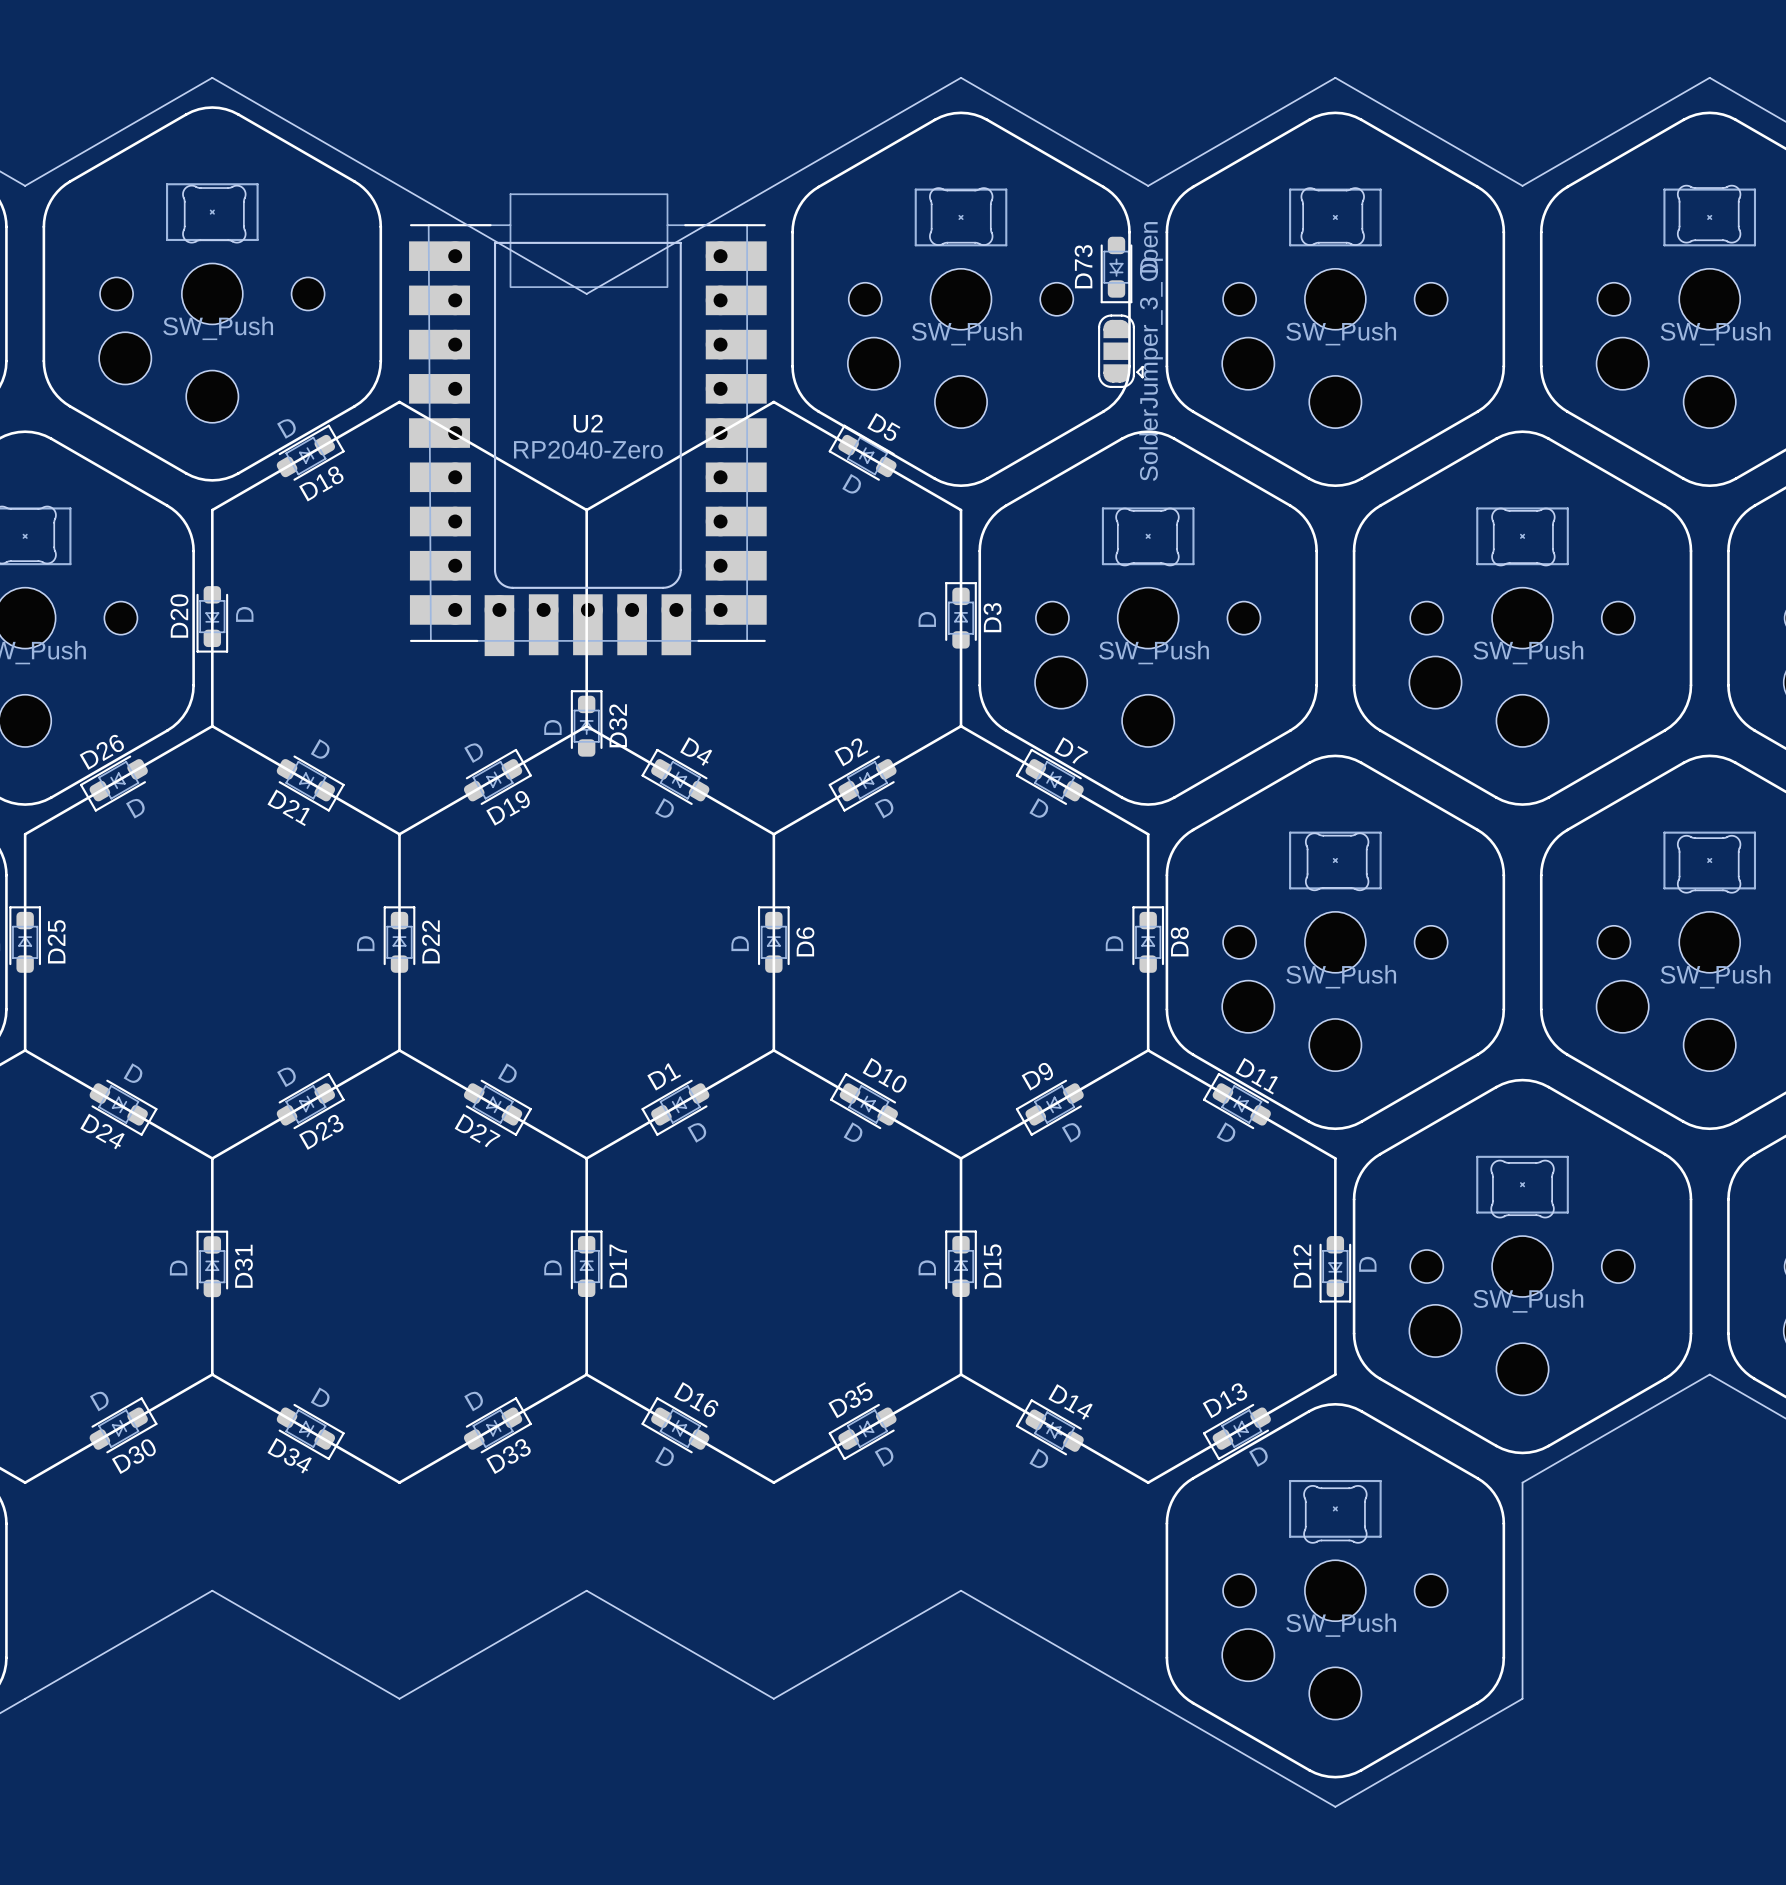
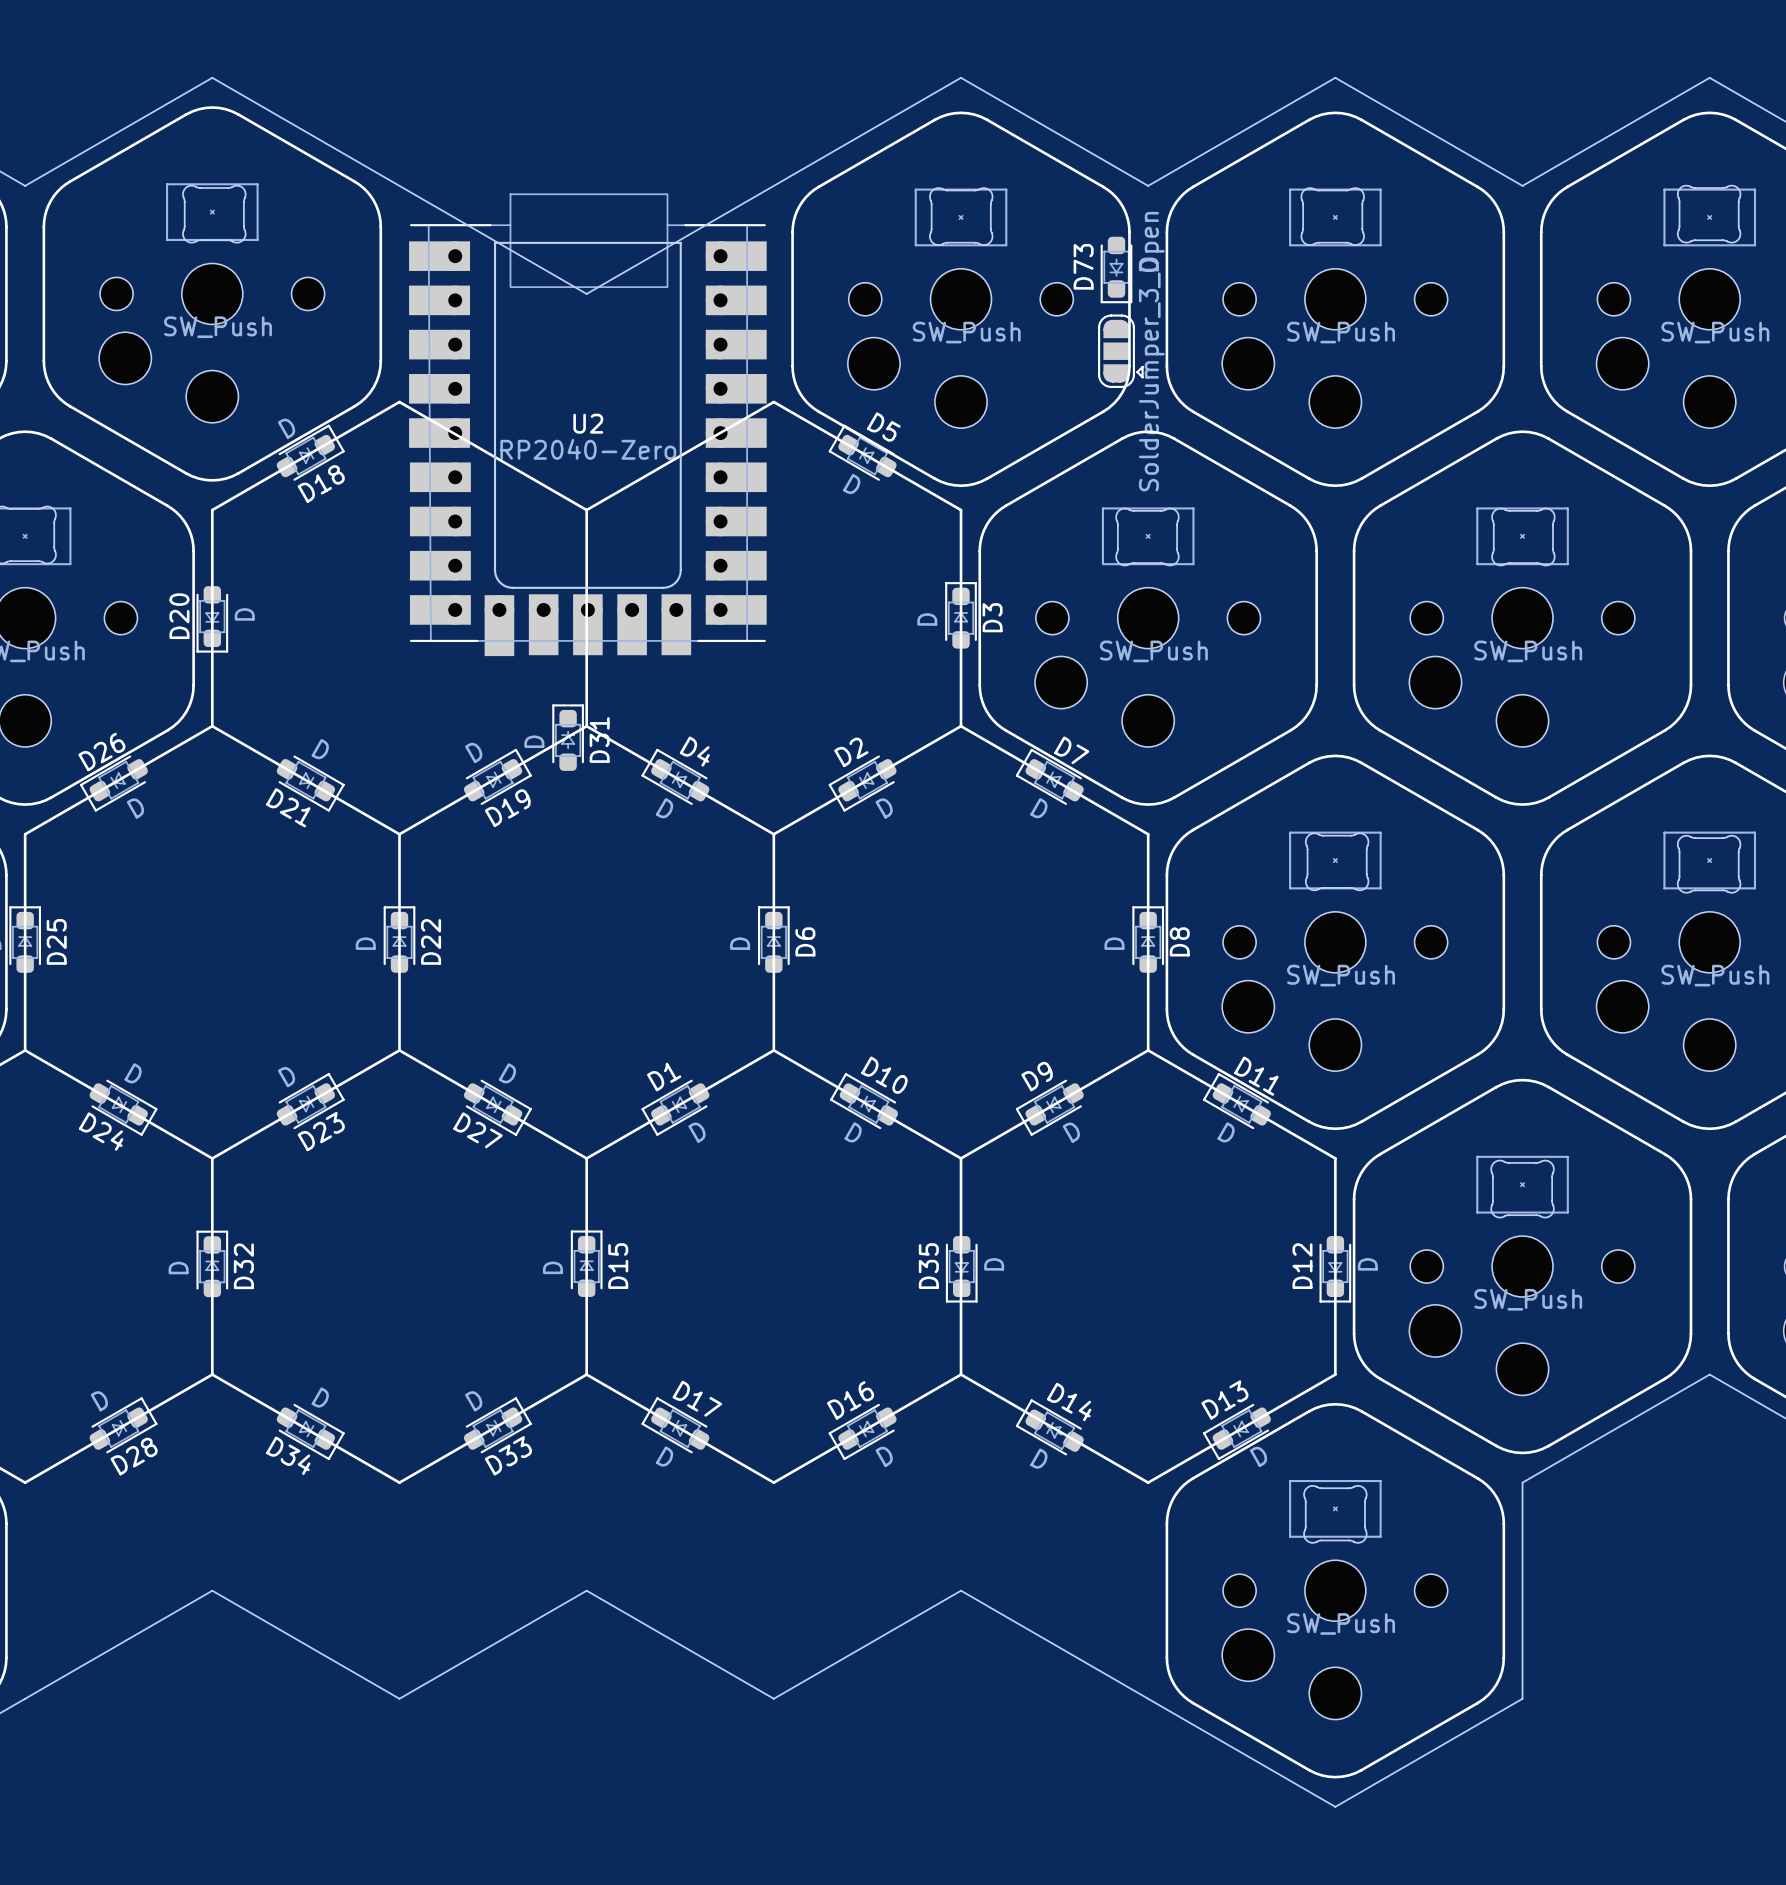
D32: D (586, 723) -> none
D31: none -> D (568, 737)
D15: D (961, 1263) -> none
D31 name: D31 (243, 1266) -> D32 (243, 1266)
D17 name: D17 (618, 1266) -> D15 (618, 1266)
D35: none -> D (961, 1269)
D16 name: D16 (696, 1399) -> D17 (697, 1398)
D35 name: D35 (850, 1400) -> D16 (850, 1400)
D30 name: D30 (133, 1456) -> D28 (134, 1456)

